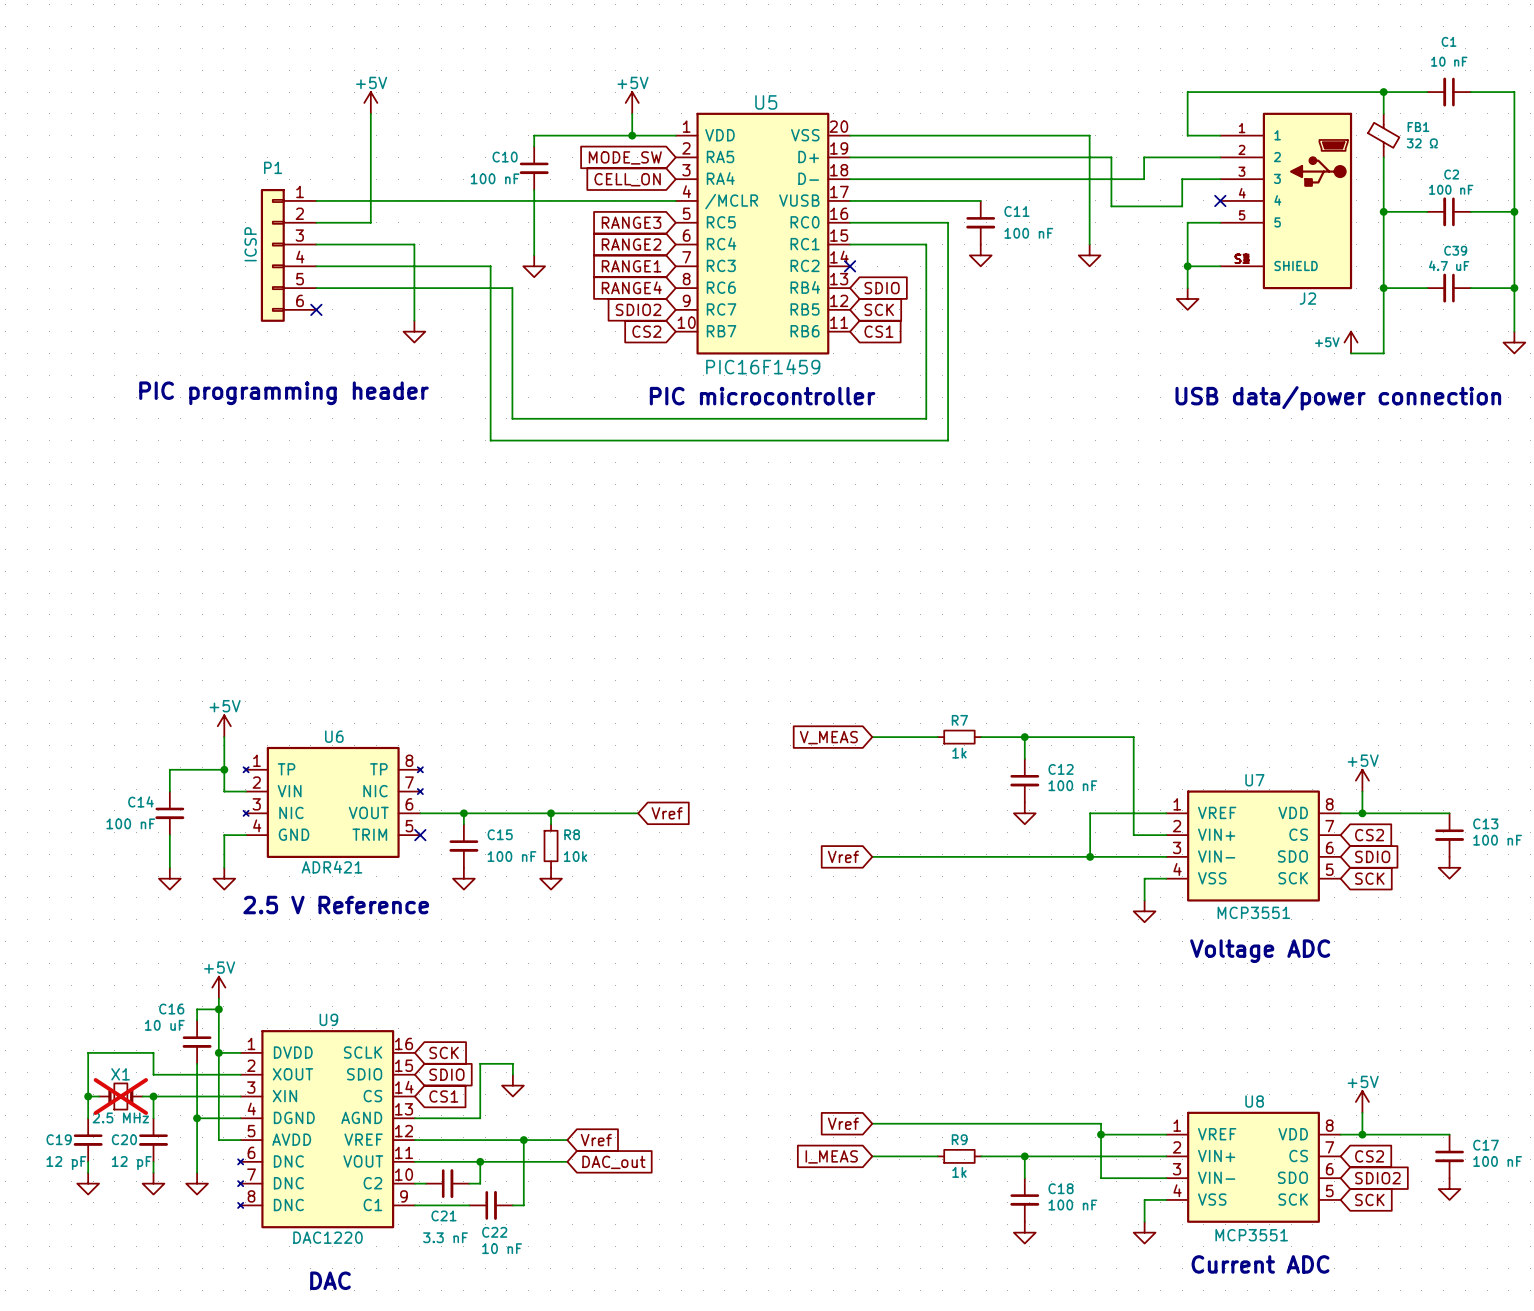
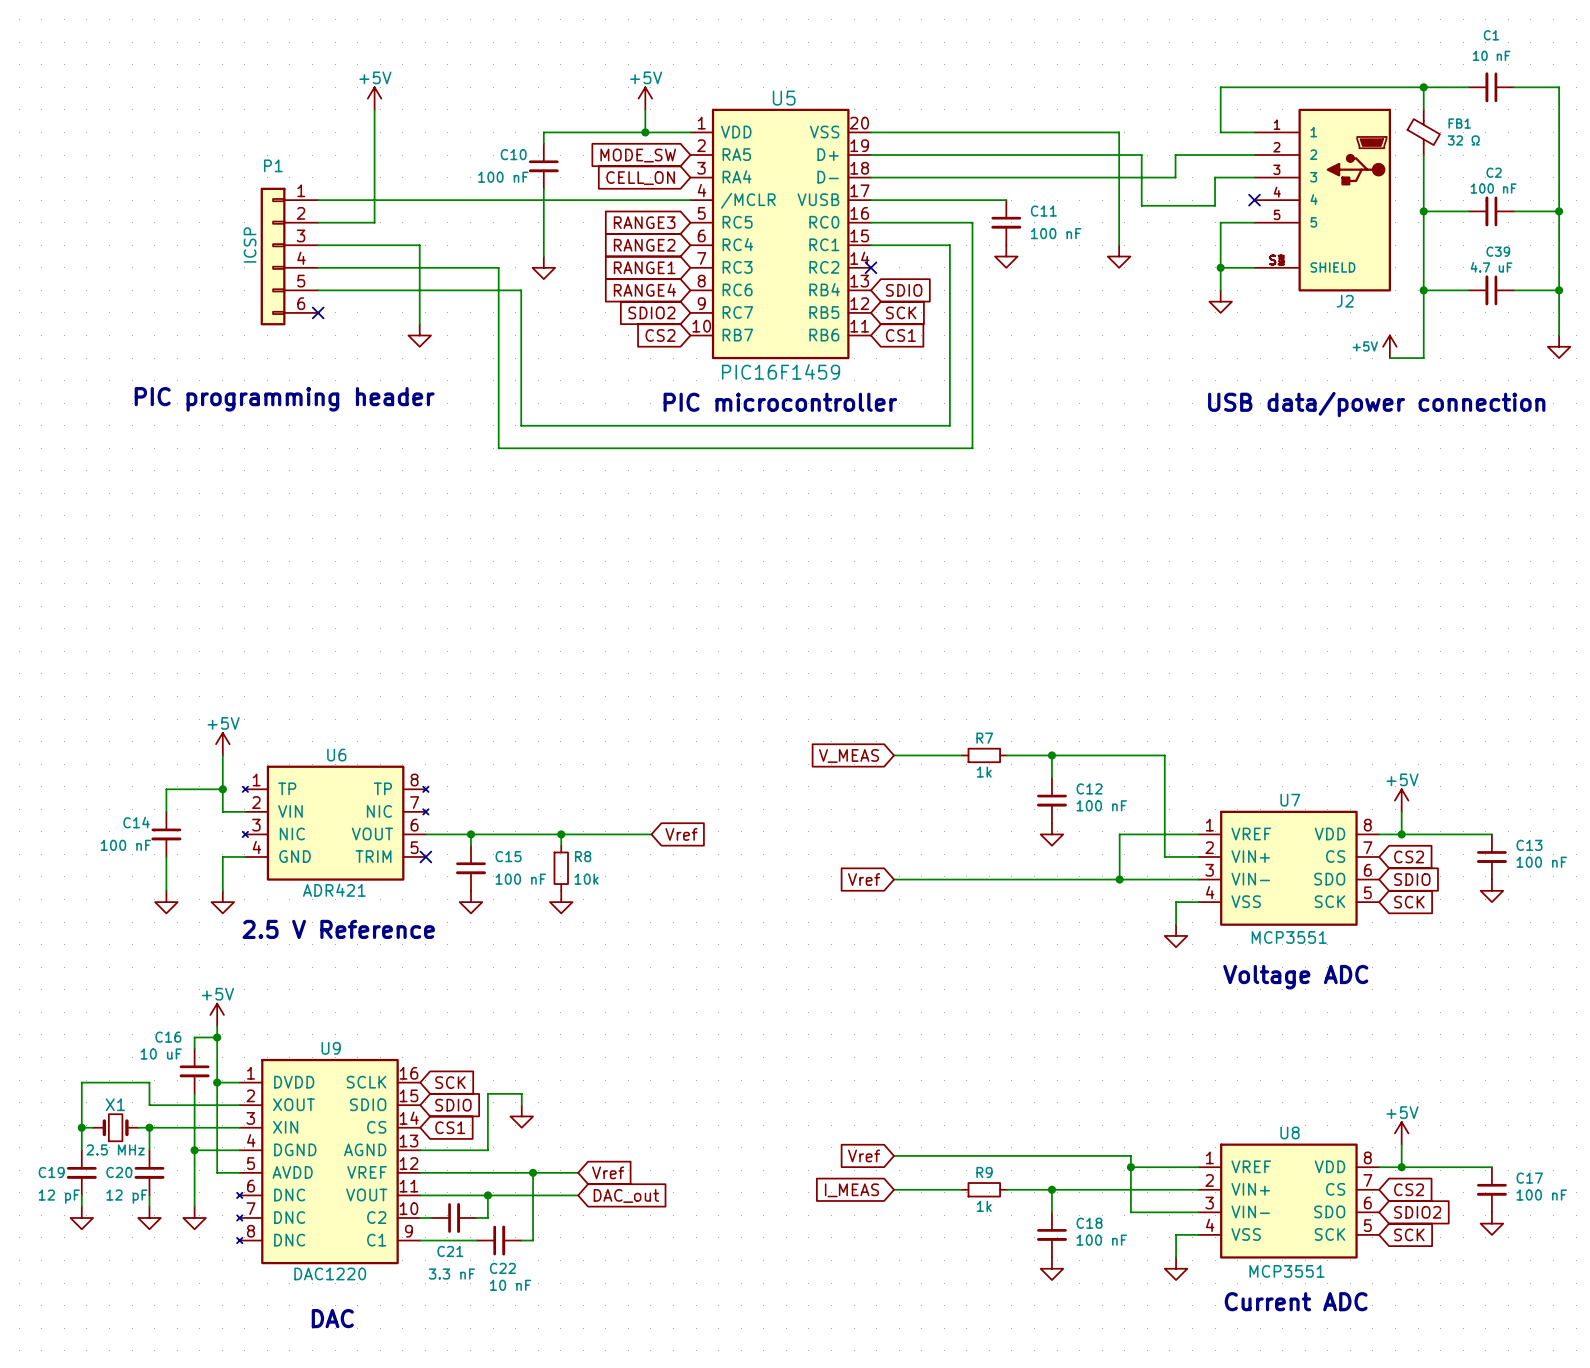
X1 do-not-place cross: (120, 1096) -> none

